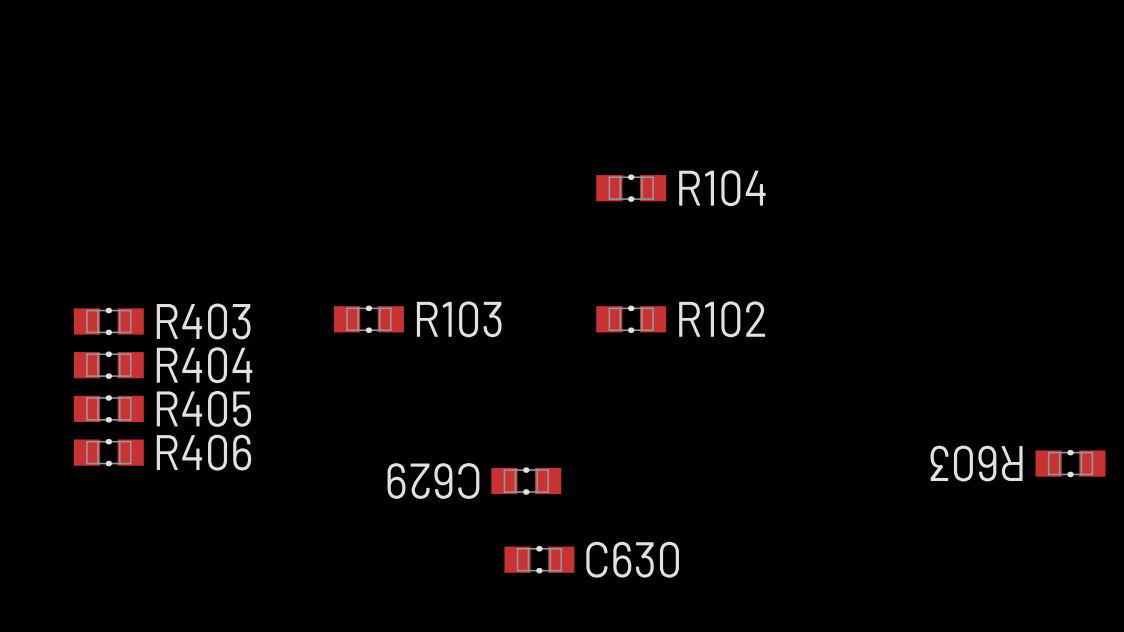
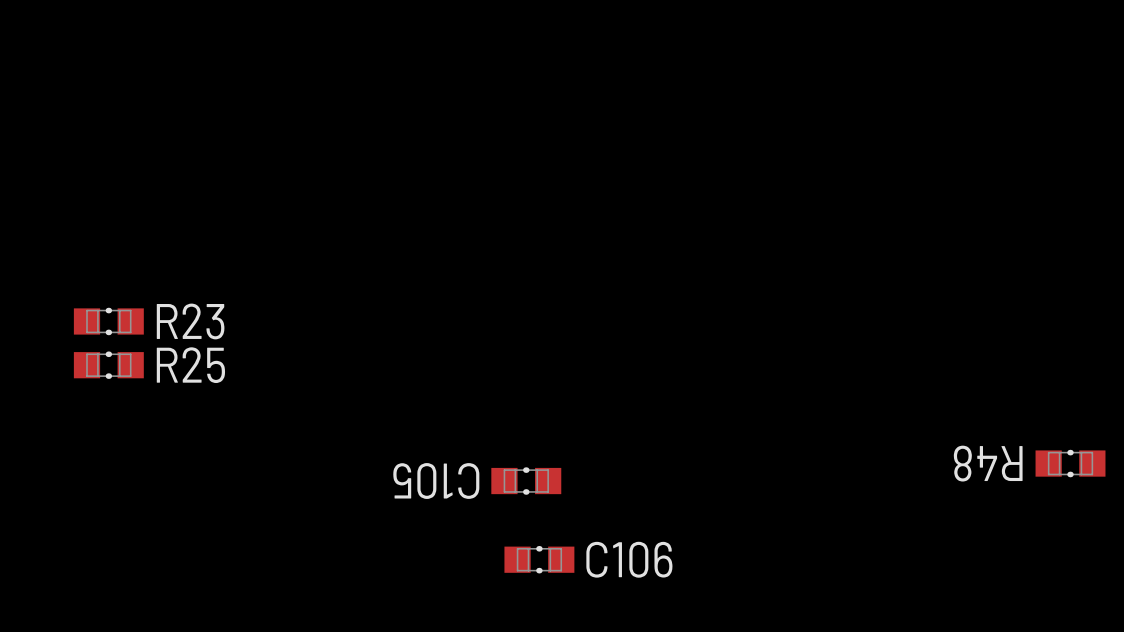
R104: (631, 188) -> none
R103: (368, 319) -> none
R102: (631, 319) -> none
R403 name: R403 (203, 321) -> R23 (190, 321)
R404 name: R404 (204, 365) -> R25 (190, 365)
R405: (108, 408) -> none
R406: (108, 452) -> none
R603 name: R603 (976, 463) -> R48 (988, 463)
C629 name: C629 (433, 481) -> C105 (436, 481)
C630 name: C630 (632, 559) -> C106 (629, 559)

